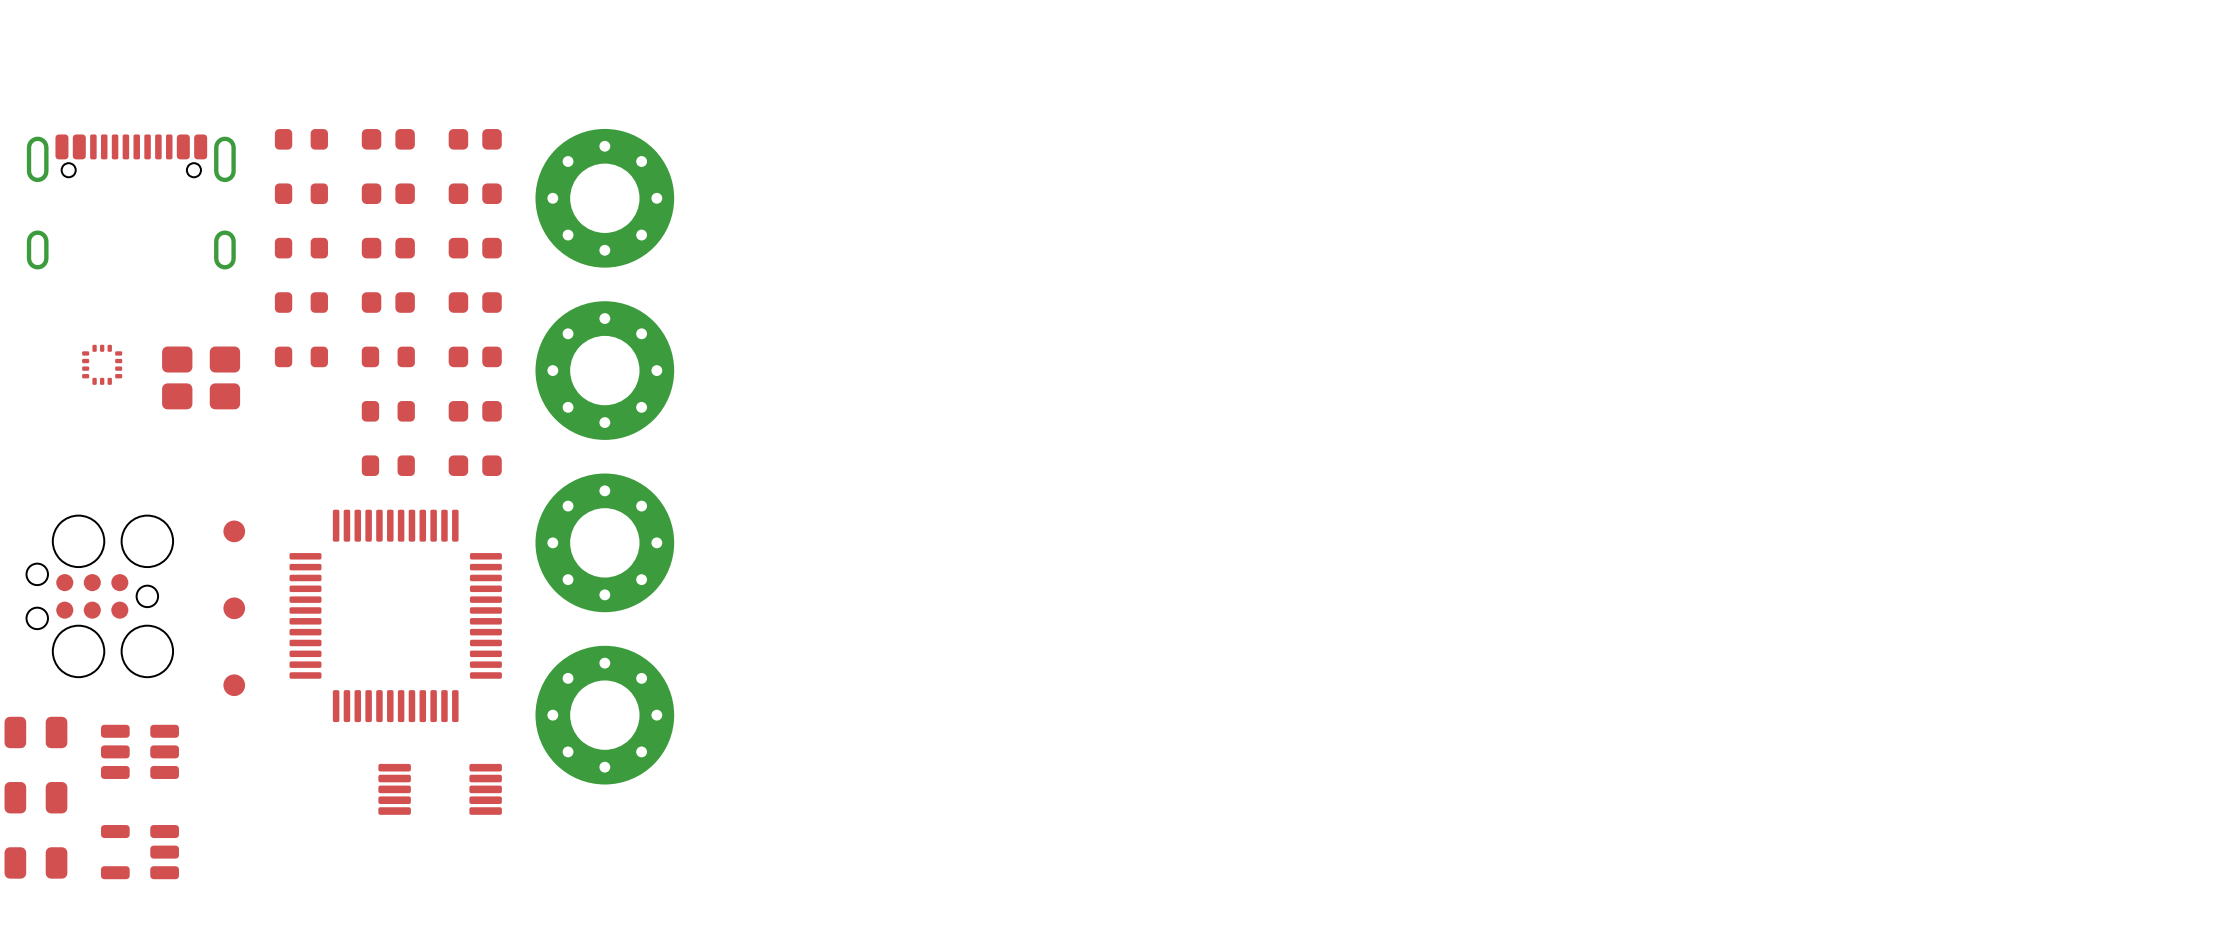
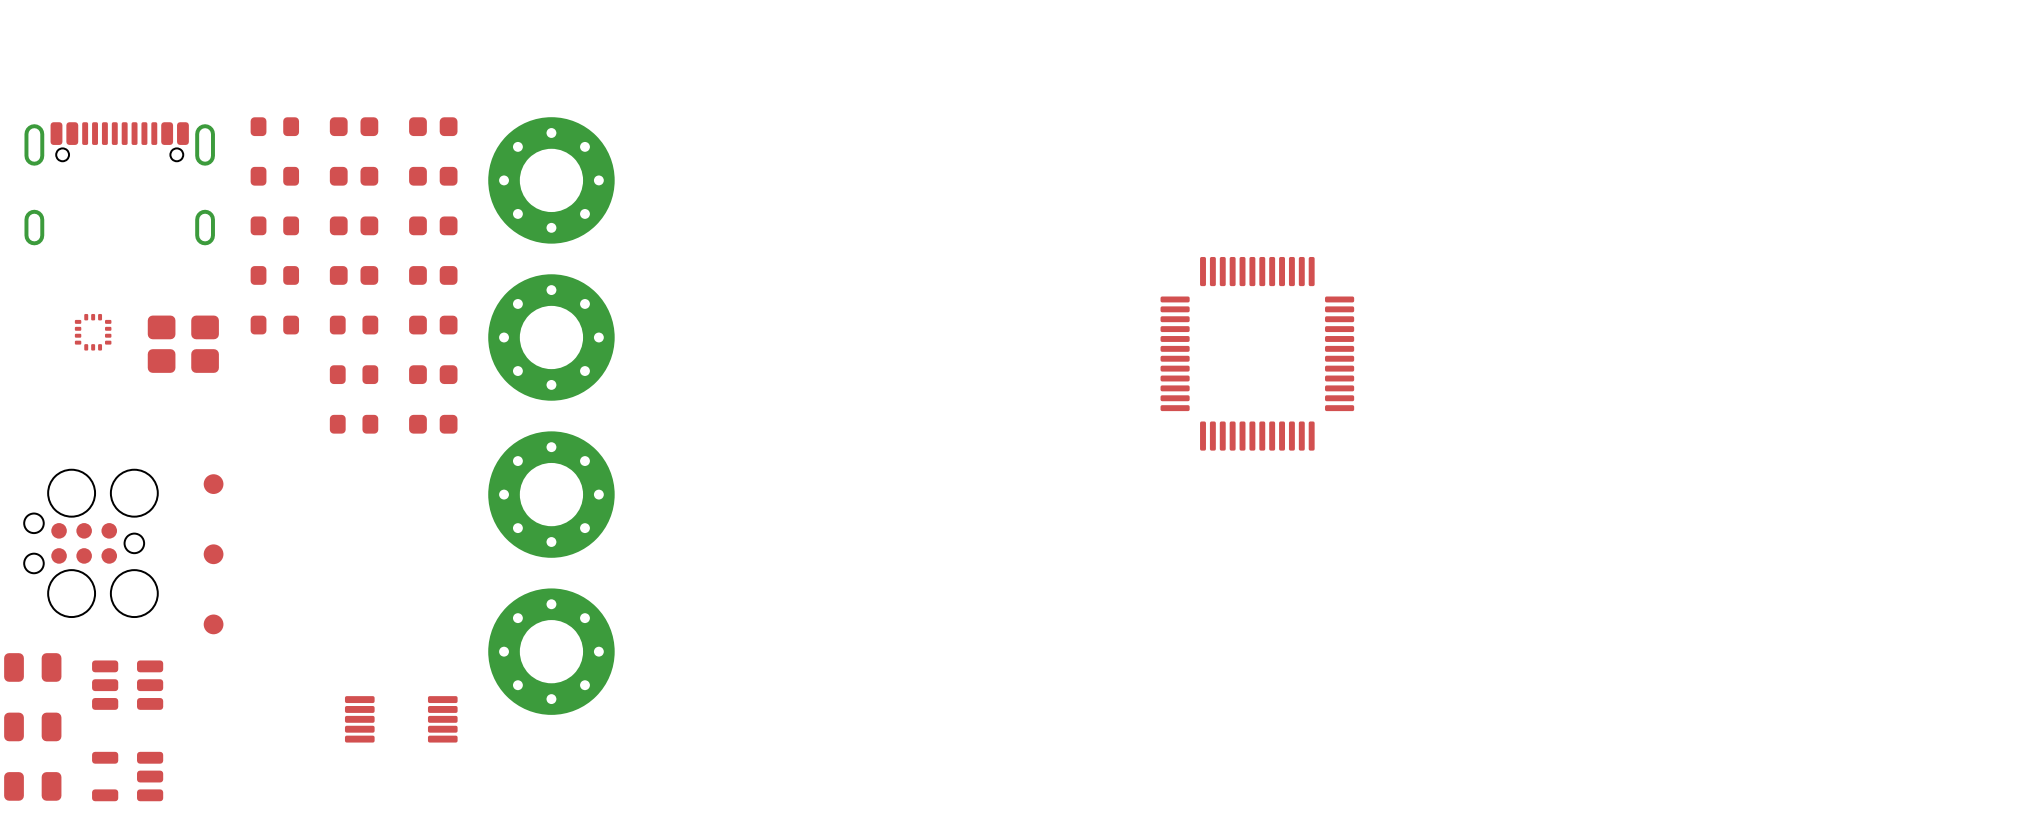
part: none -> (1257, 353)
part: (395, 615) -> none

